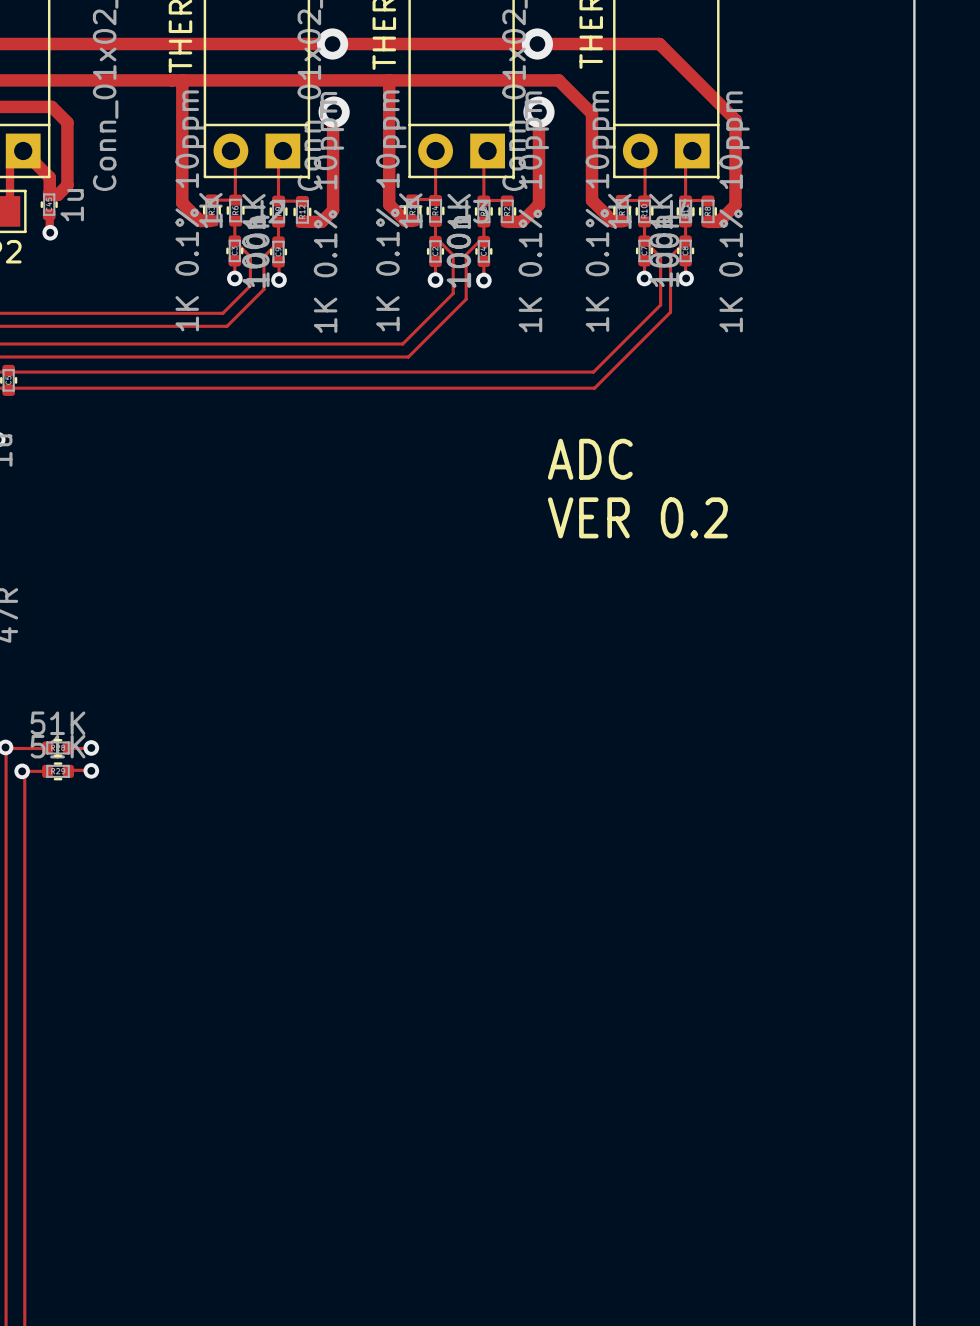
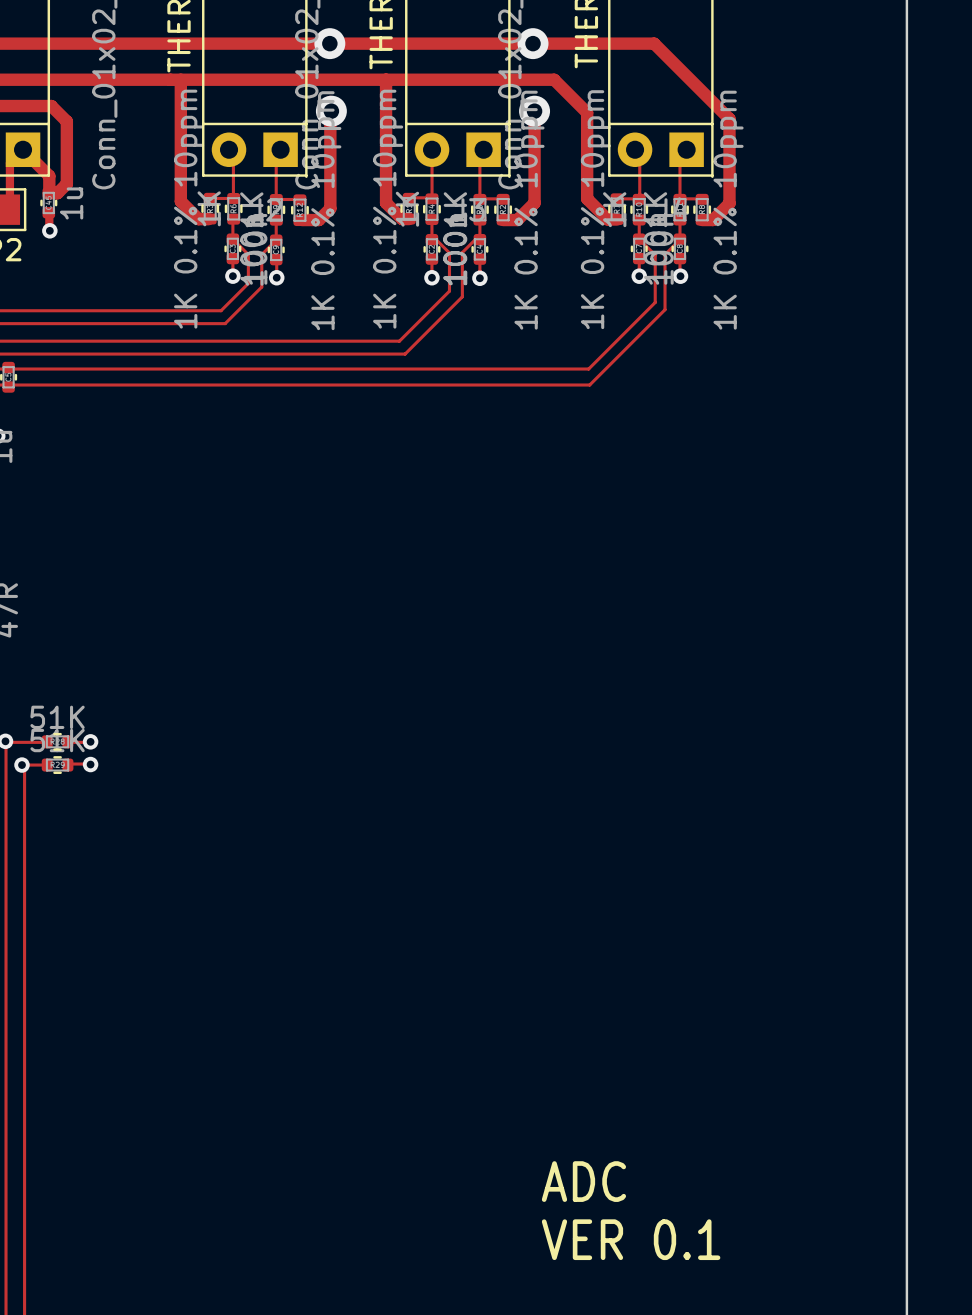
text: ADC (590, 459) -> none
text: VER 0.2 (637, 517) -> none
text: none -> ADC (583, 1181)
text: none -> VER 0.1 (631, 1239)

